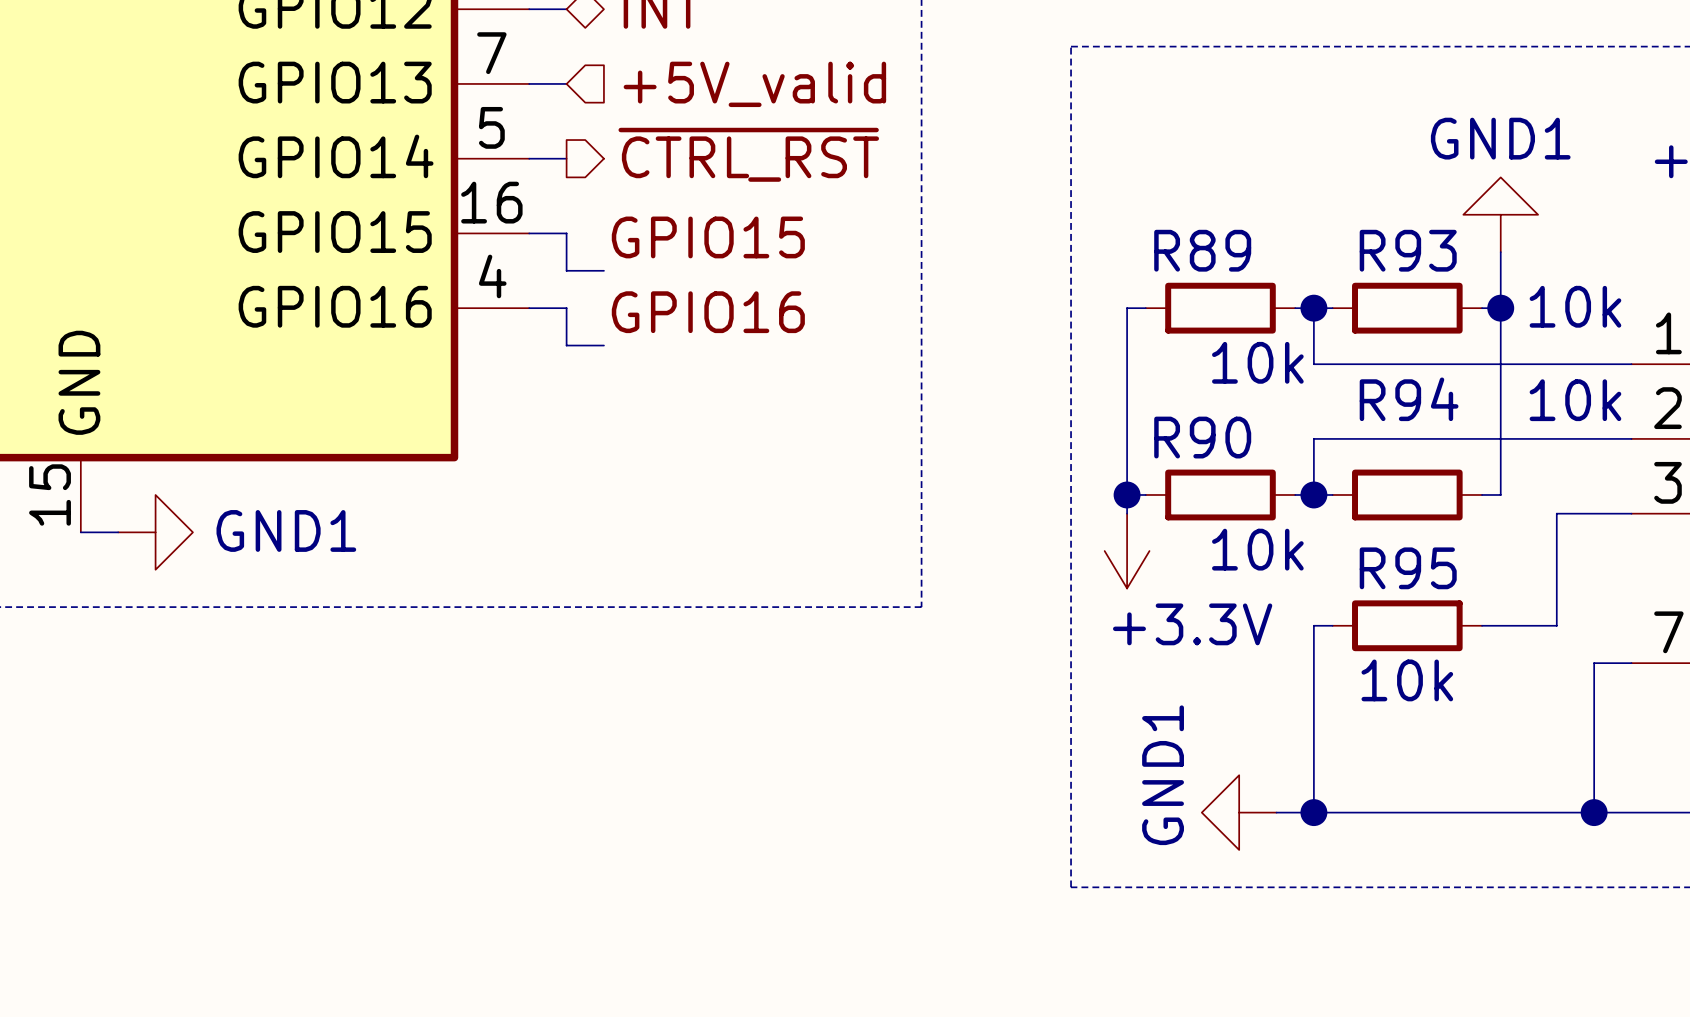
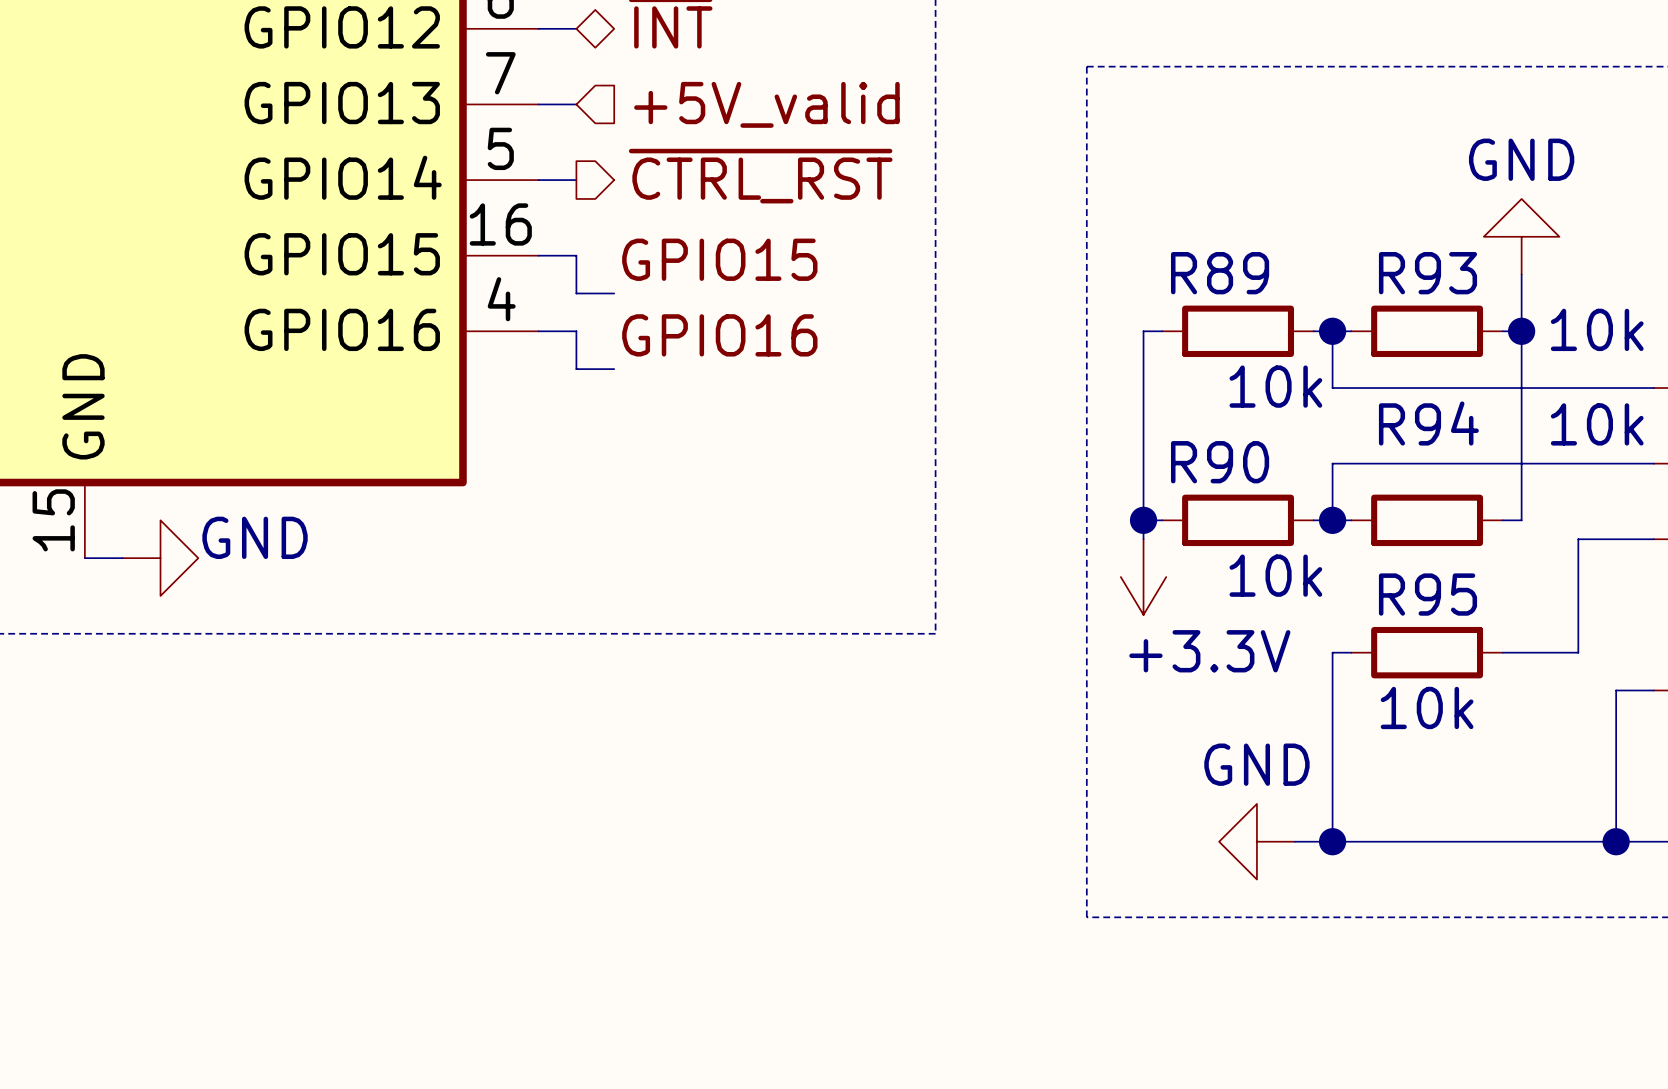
power symbol: GND1 (1500, 214) -> GND (1521, 236)
power symbol: GND1 (155, 532) -> GND (160, 558)
power symbol: GND1 (1239, 812) -> GND (1256, 841)

